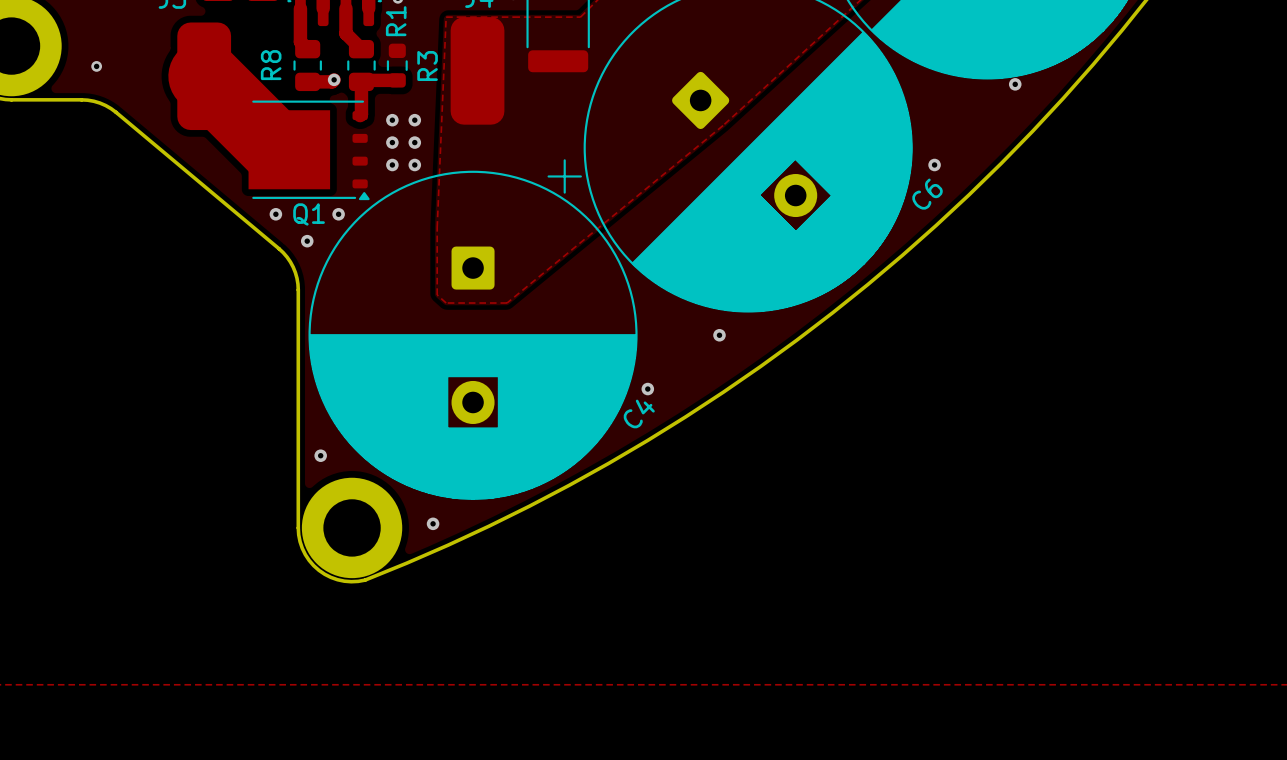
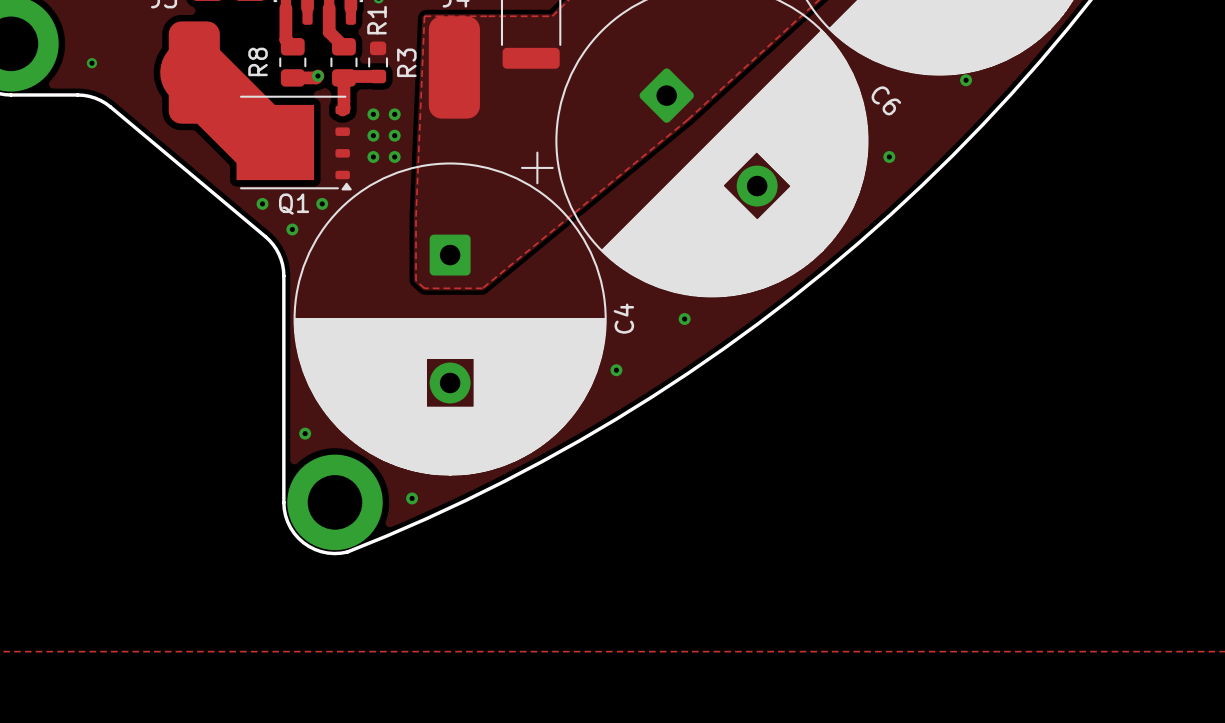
C6 name rotation: 0° (927, 194) -> 90° clockwise (886, 100)
C6 name position: C6 (927, 194) -> C6 (886, 100)
C4 name rotation: 0° (639, 413) -> 45° counterclockwise (623, 318)
C4 name position: C4 (639, 413) -> C4 (623, 318)

